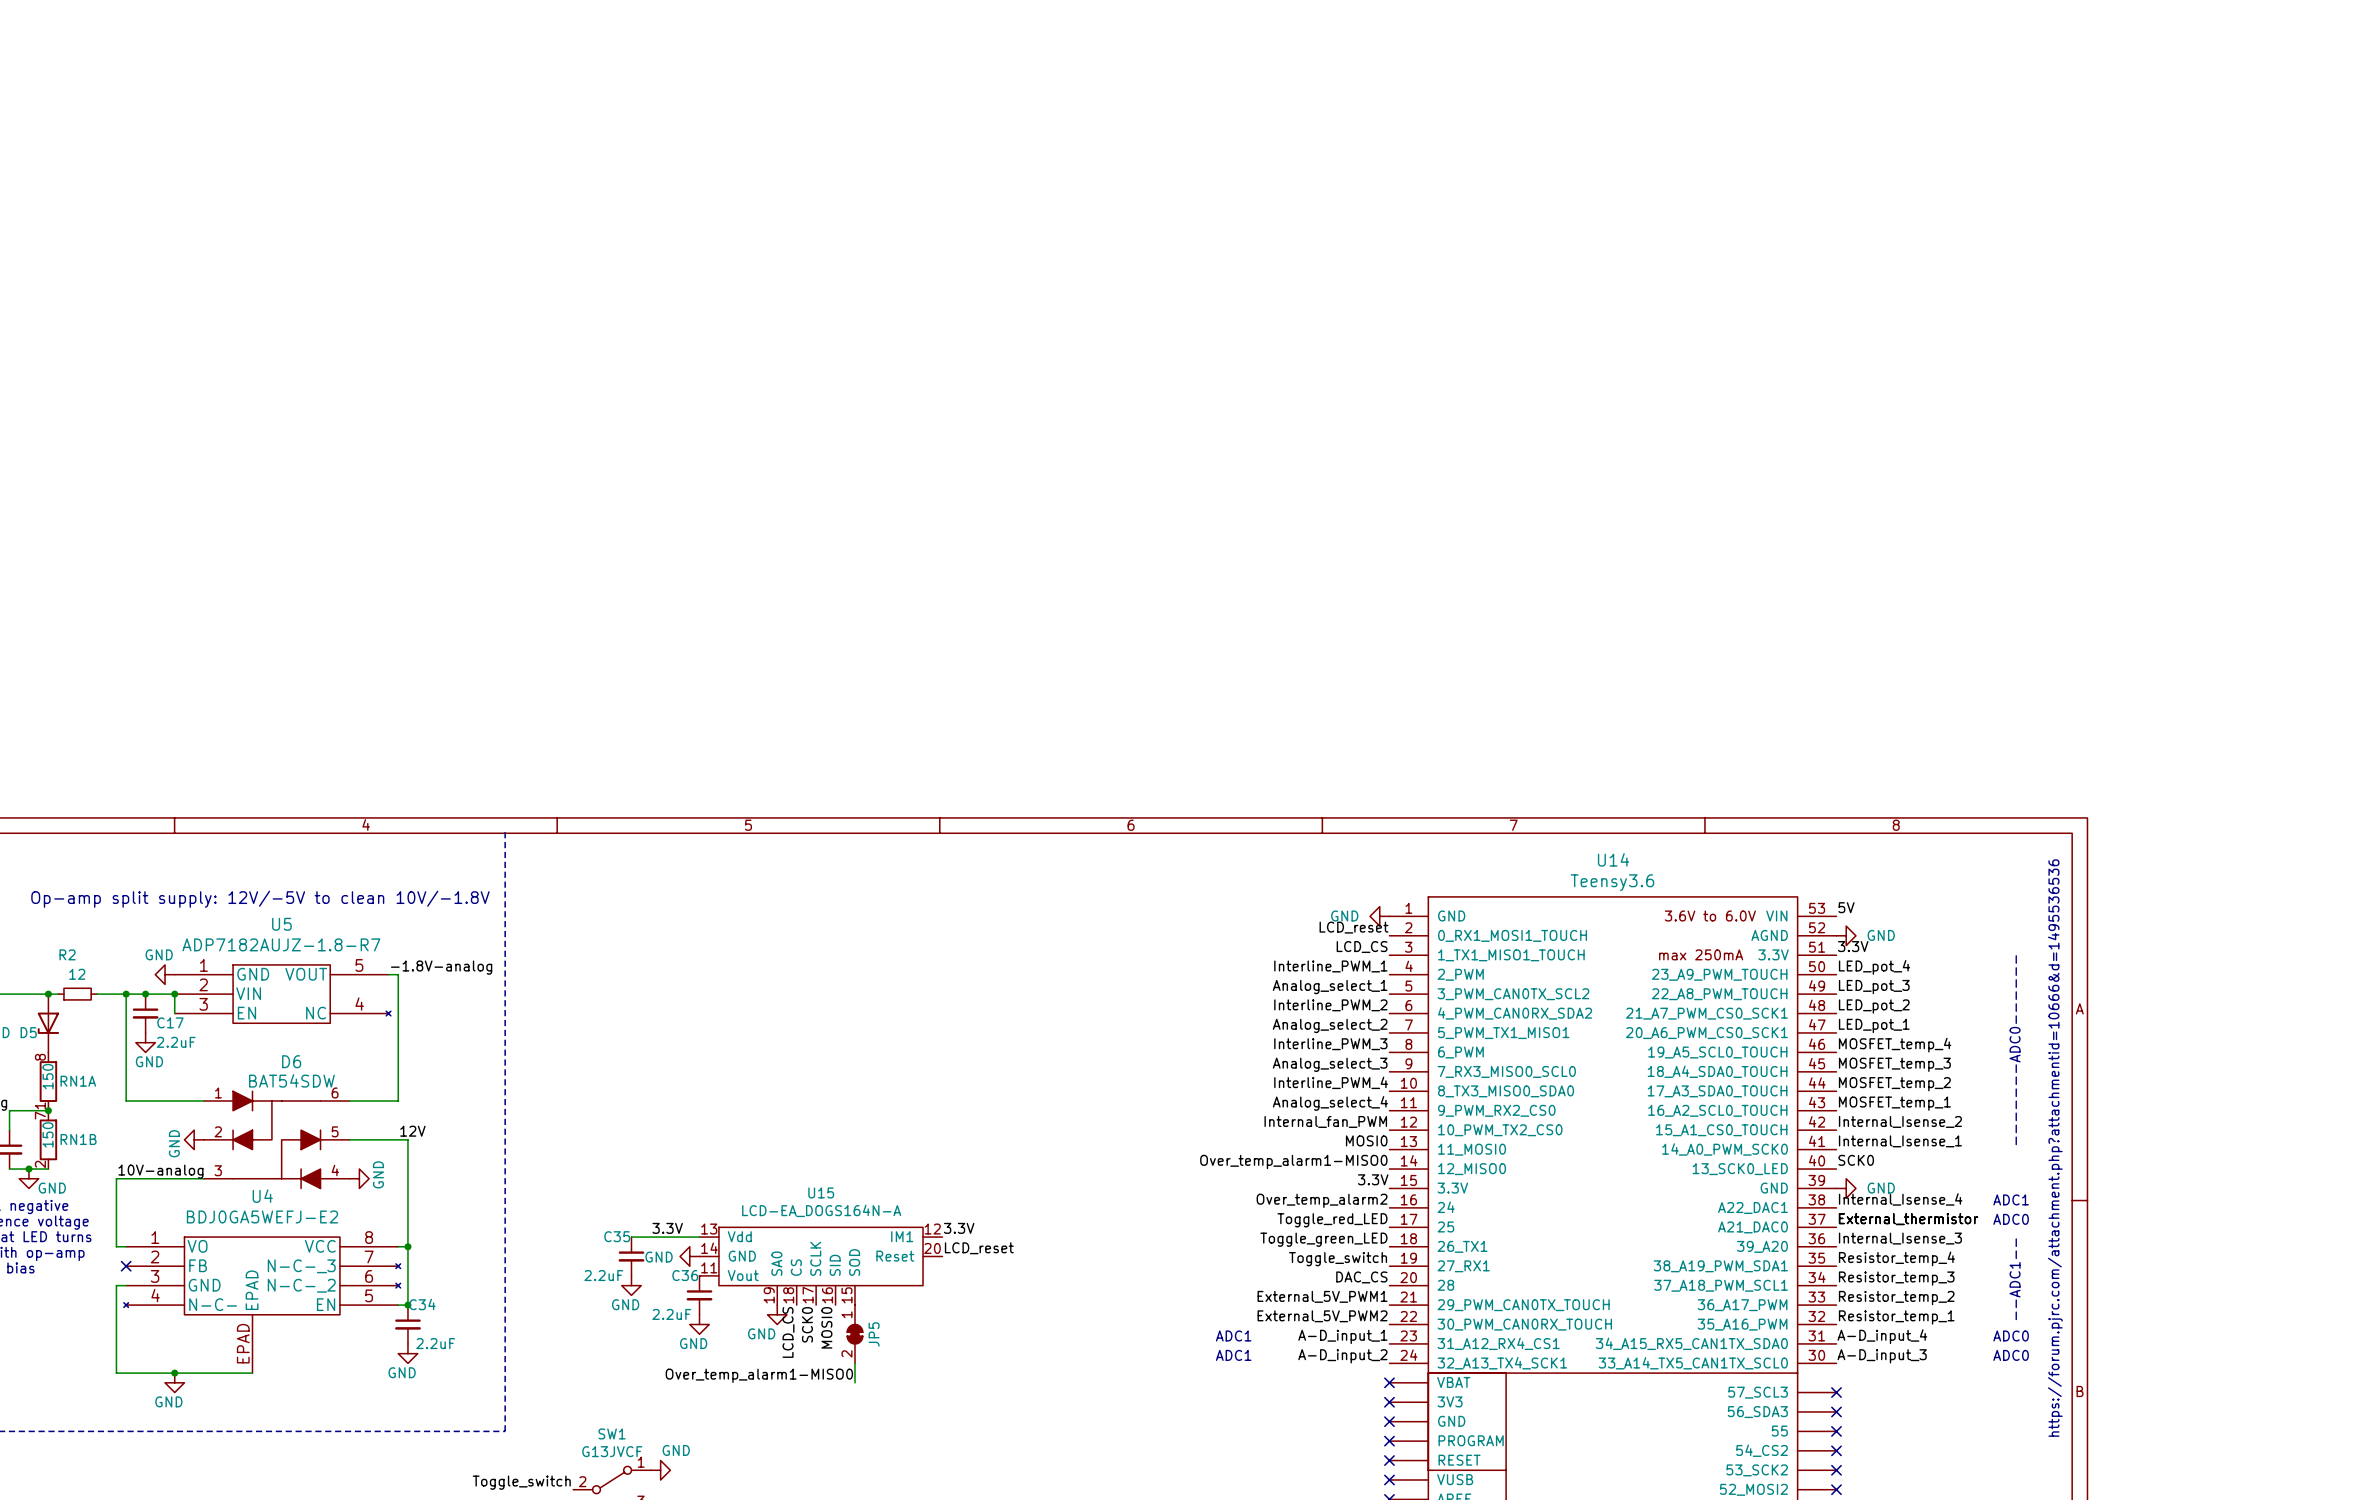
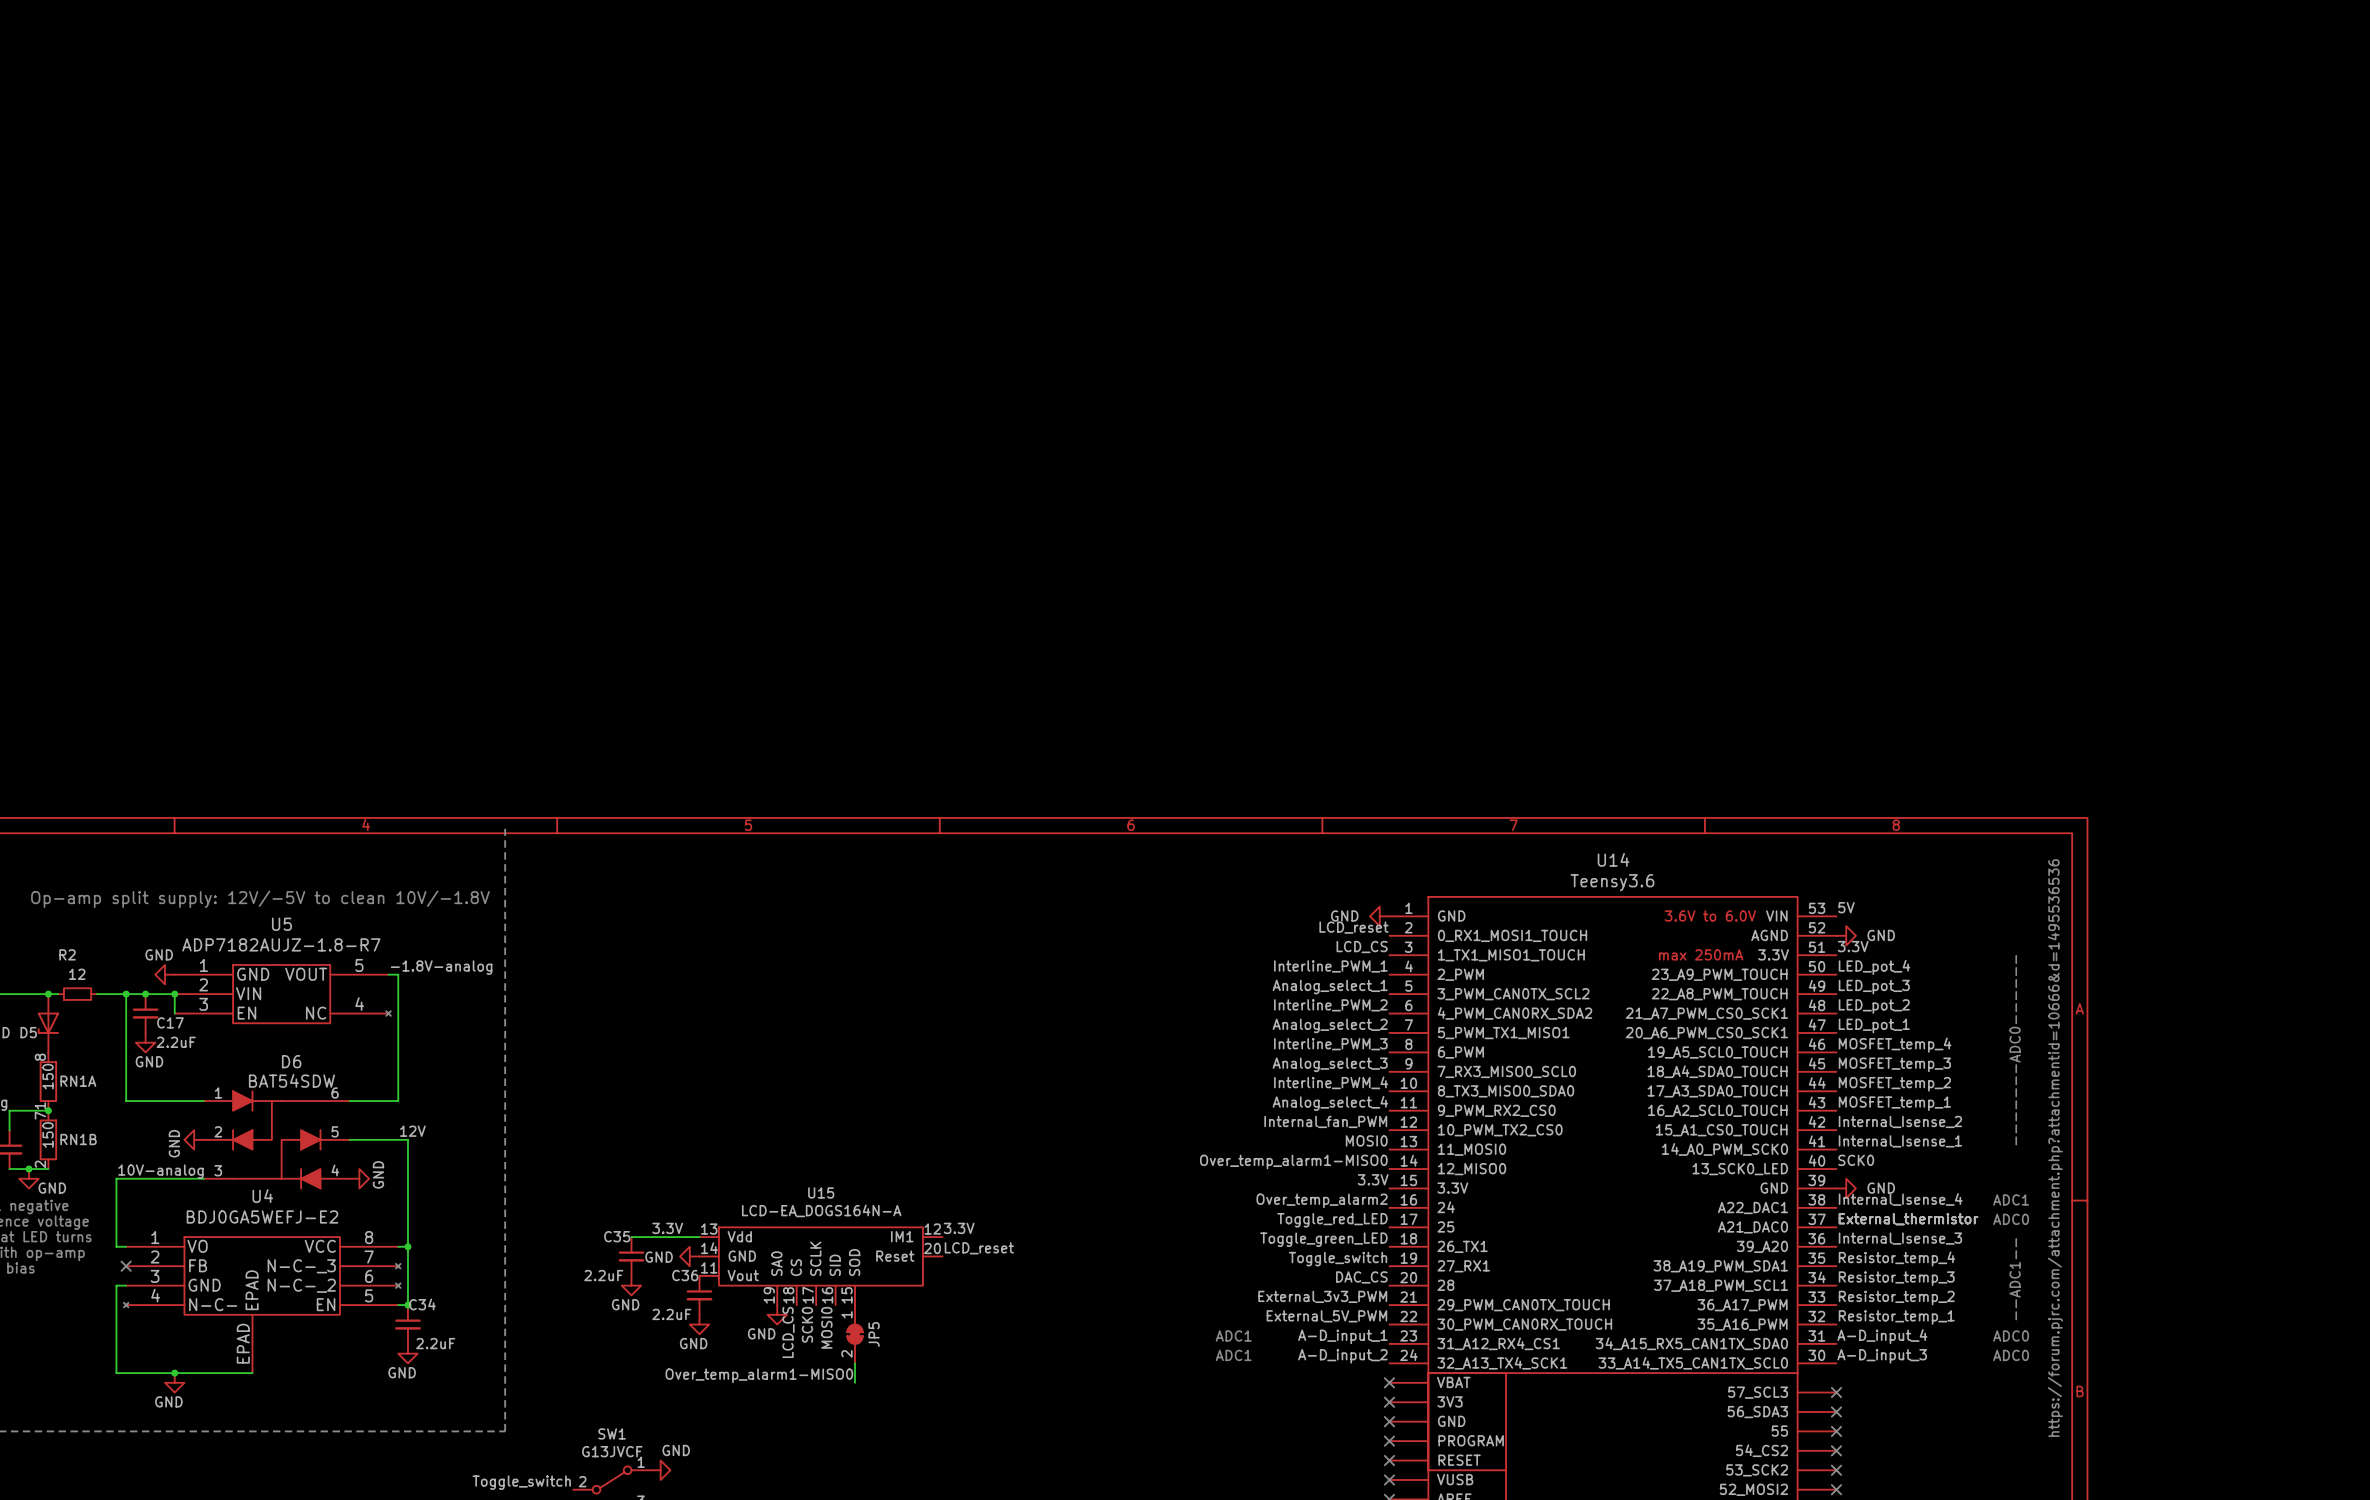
label: External_5V_PWM1 (1322, 1296) -> External_3v3_PWM (1322, 1296)
label: External_5V_PWM2 (1322, 1316) -> External_5V_PWM (1326, 1316)

